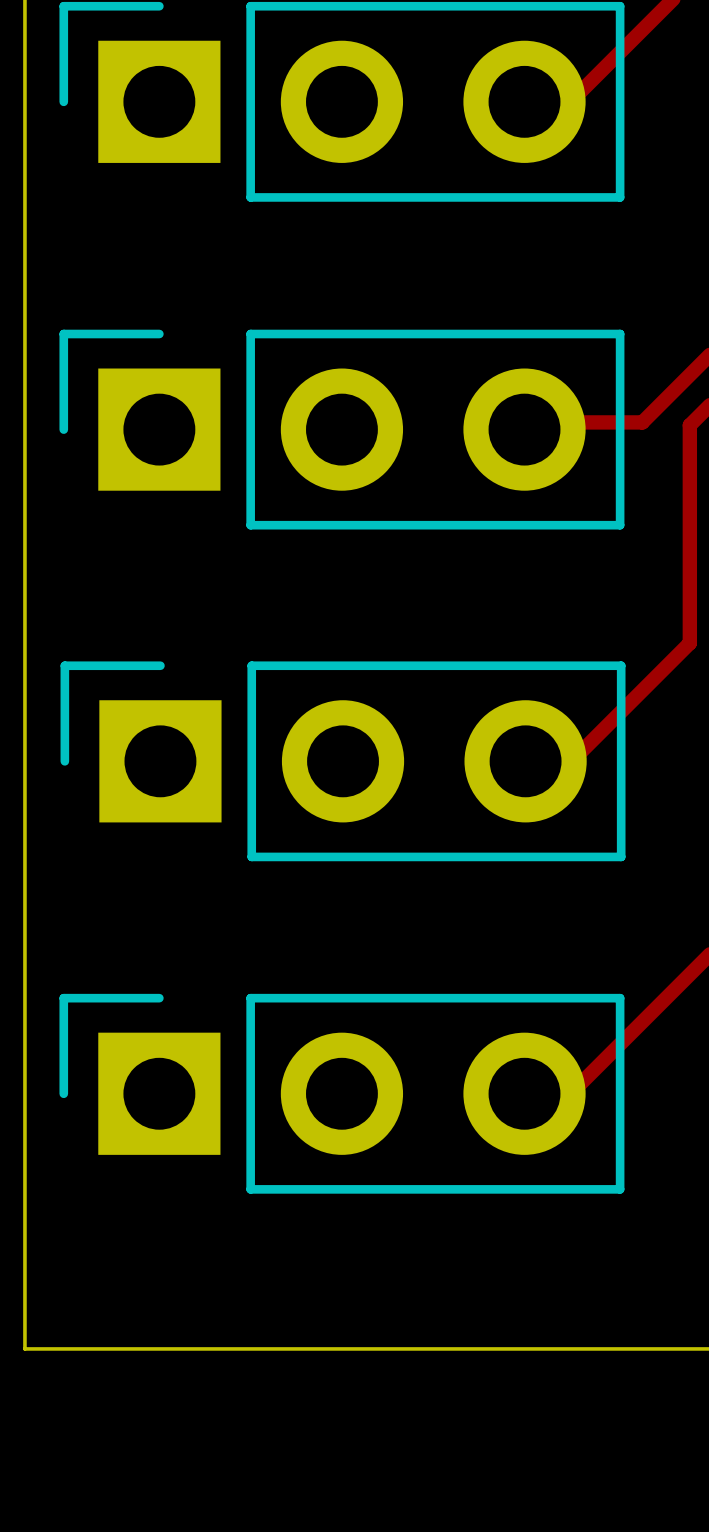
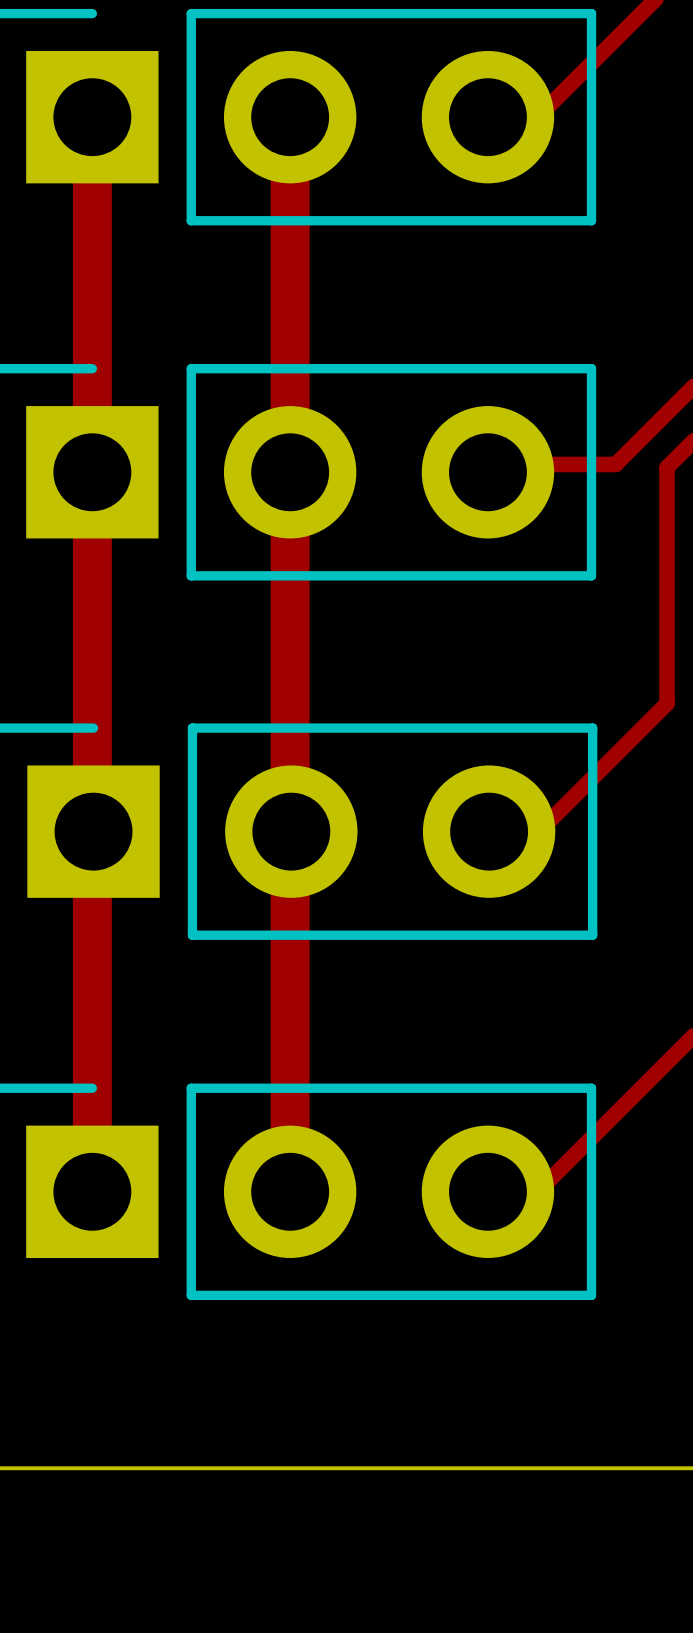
track: none -> (92, 117) (92, 1191)
track: none -> (290, 117) (290, 1191)

